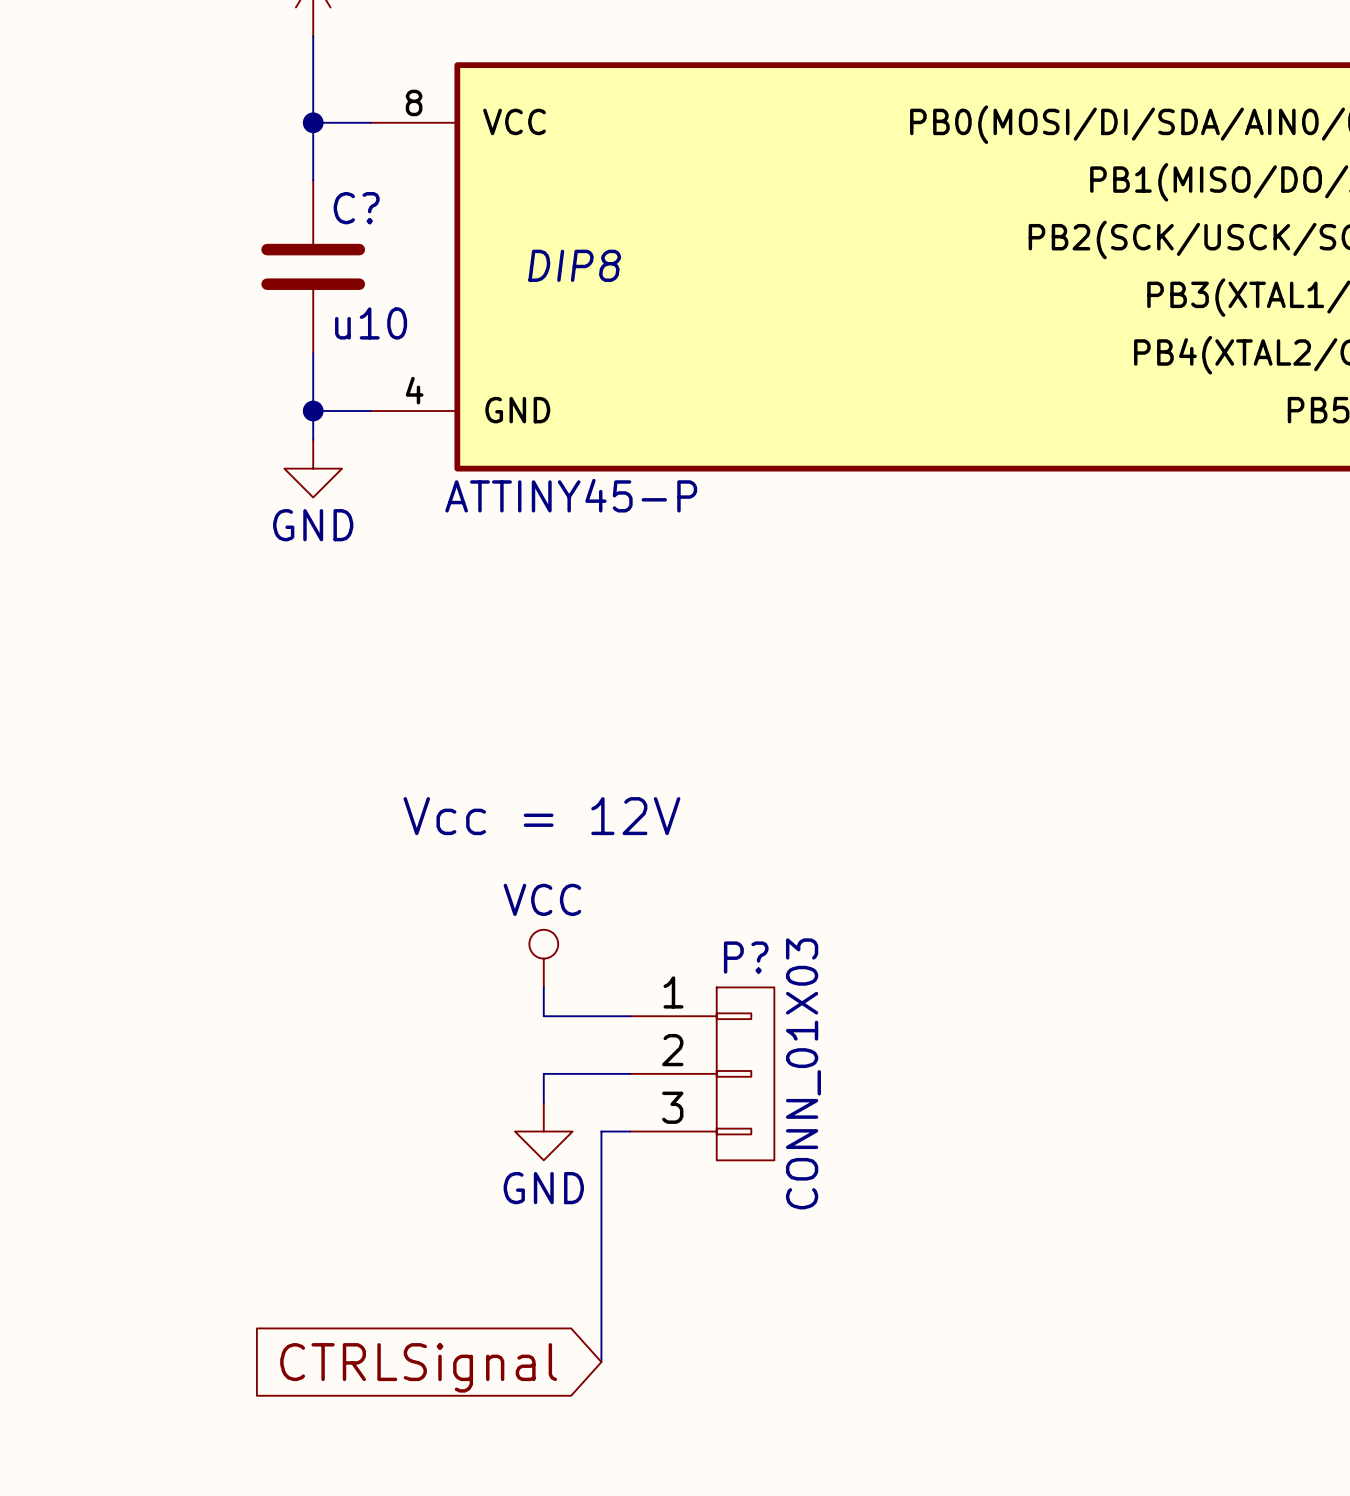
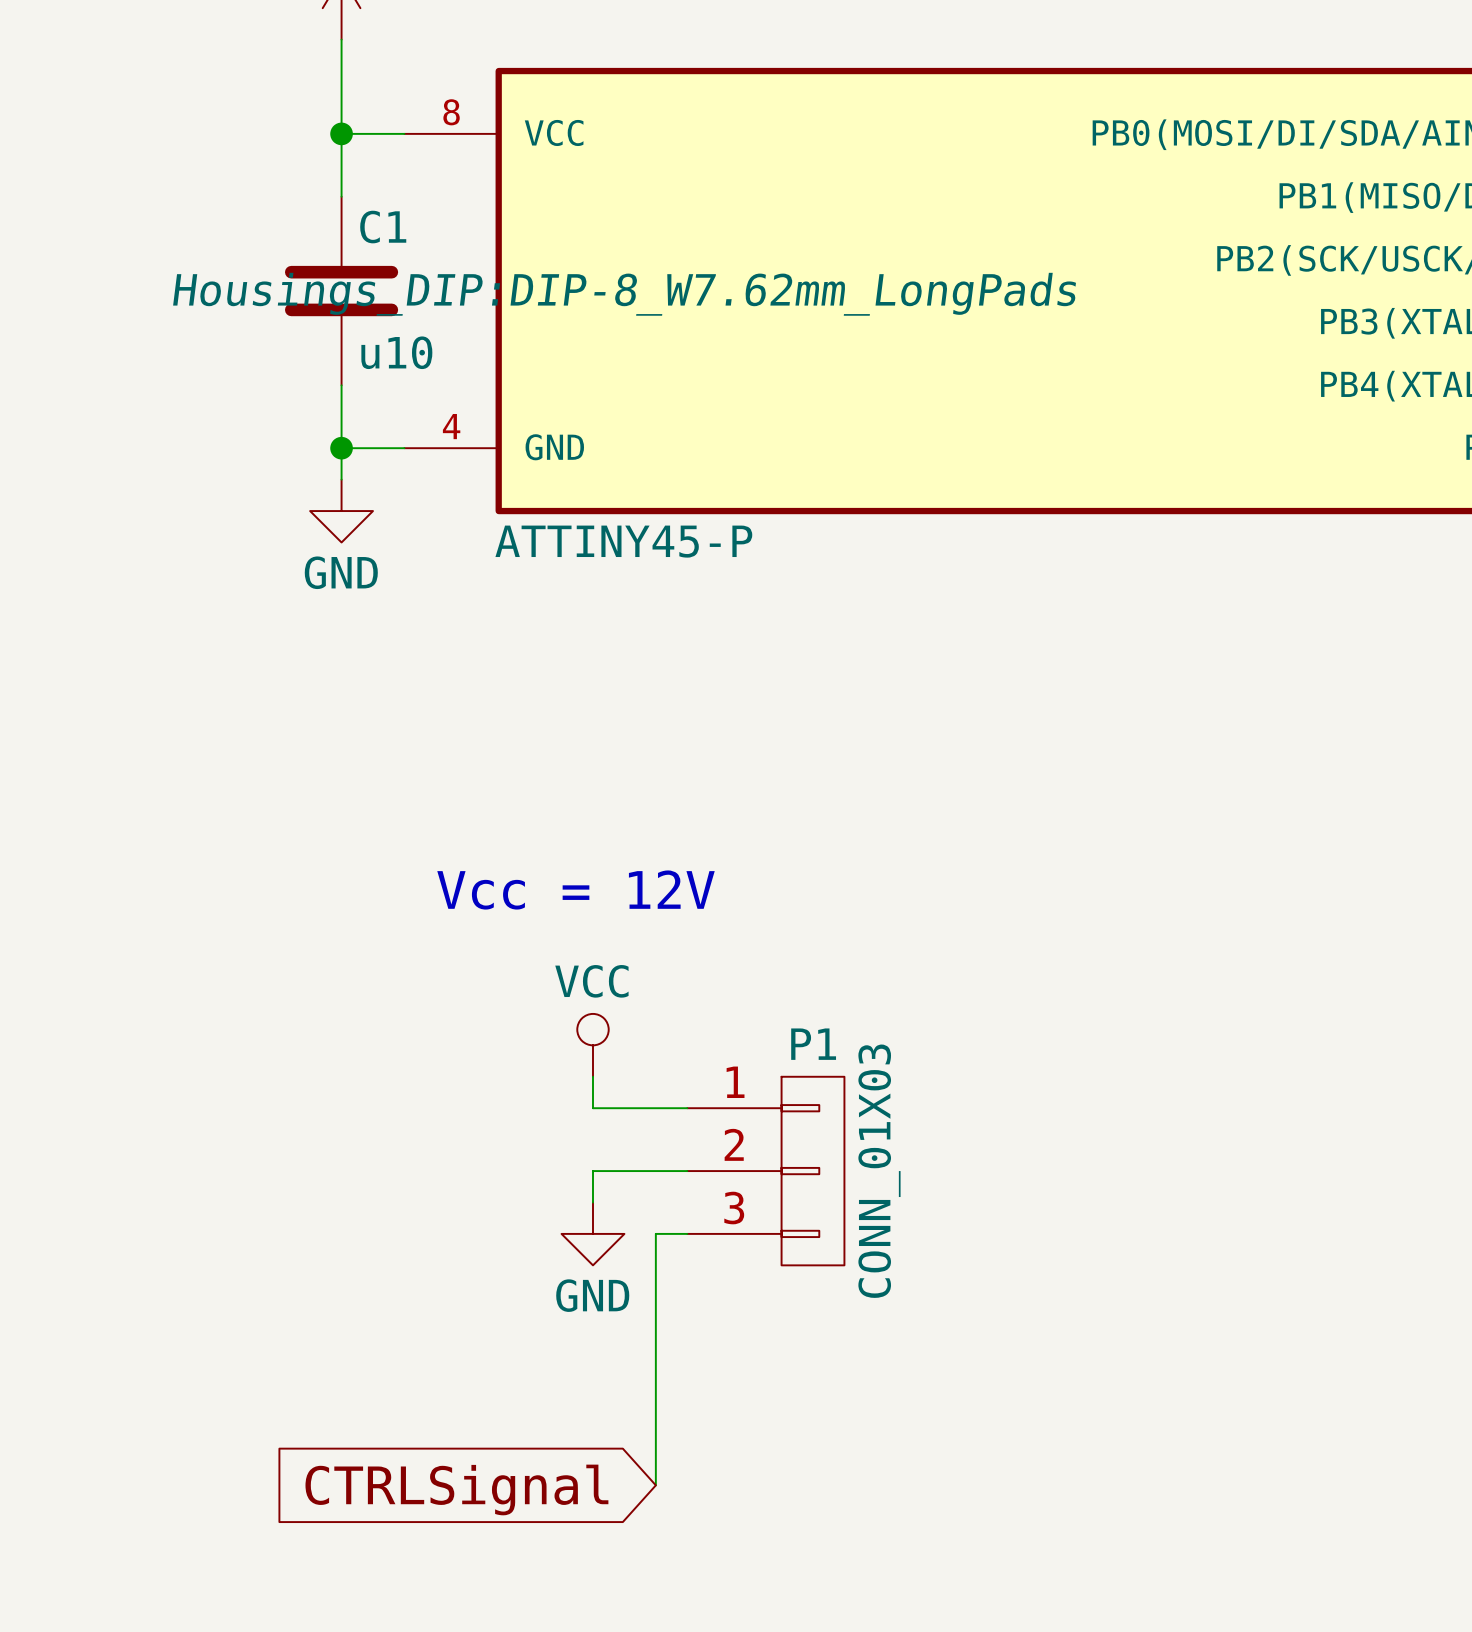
C? name: C? (356, 208) -> C1 (383, 227)
part text: DIP8 (574, 265) -> Housings_DIP:DIP-8_W7.62mm_LongPads (624, 294)
P? name: P? (746, 957) -> P1 (813, 1044)

